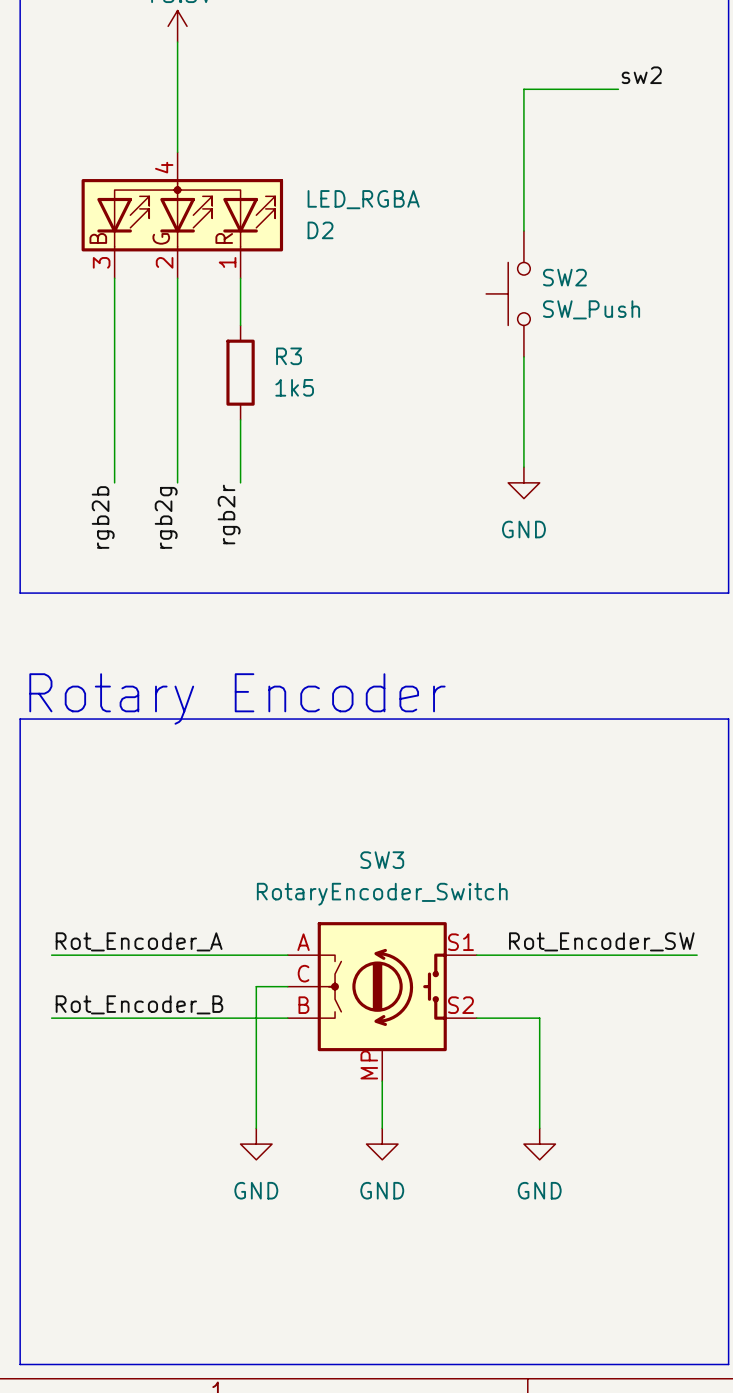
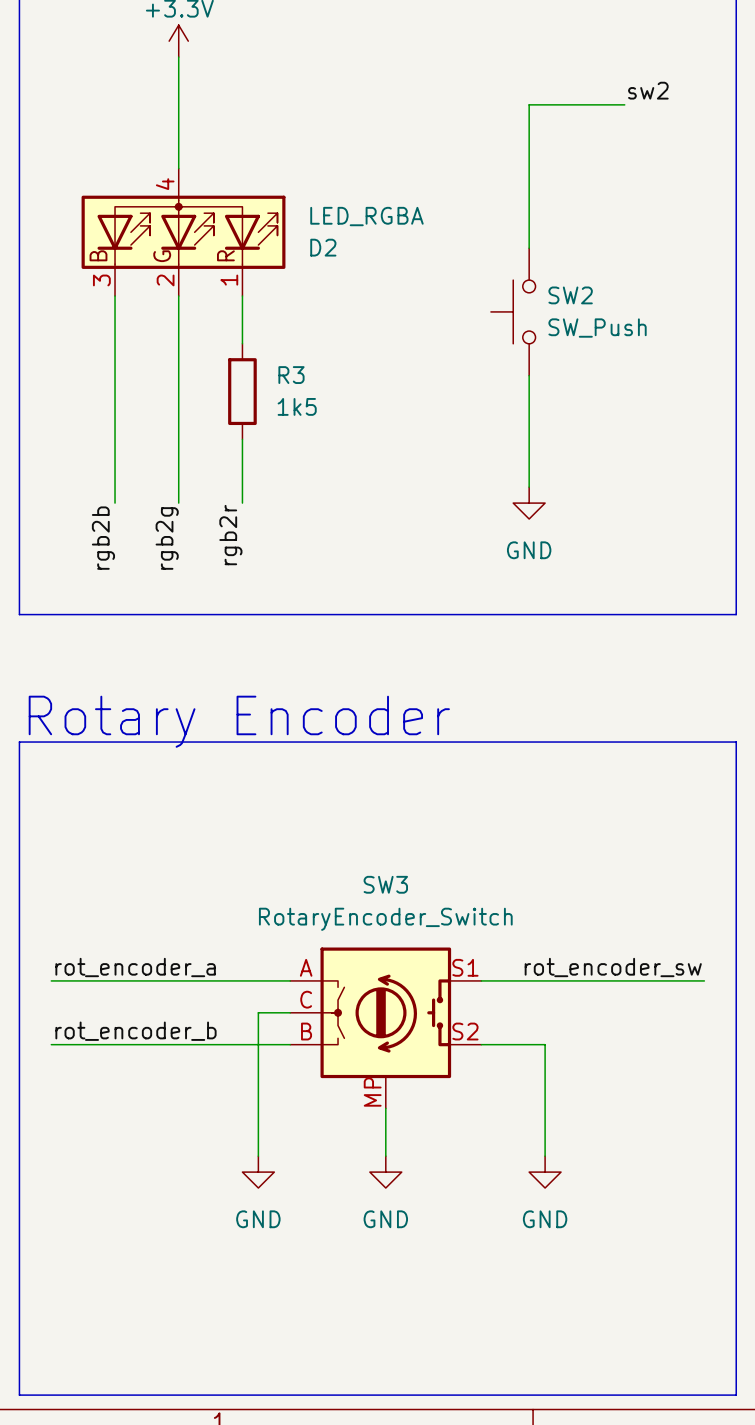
label: Rot_Encoder_A (139, 941) -> rot_encoder_a (135, 967)
label: Rot_Encoder_SW (601, 941) -> rot_encoder_sw (613, 967)
label: Rot_Encoder_B (139, 1004) -> rot_encoder_b (135, 1031)

